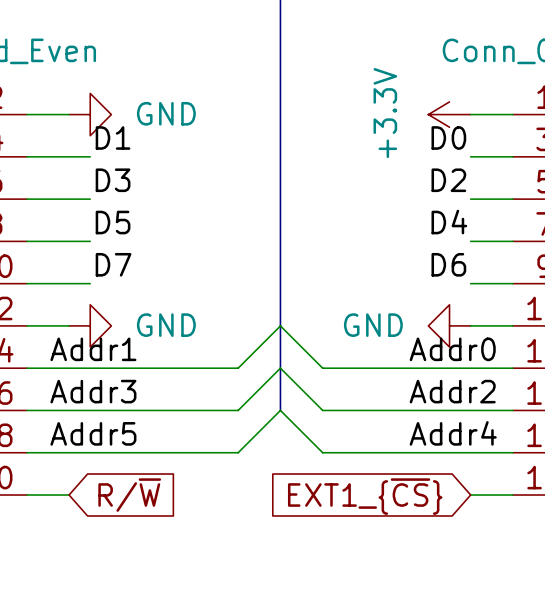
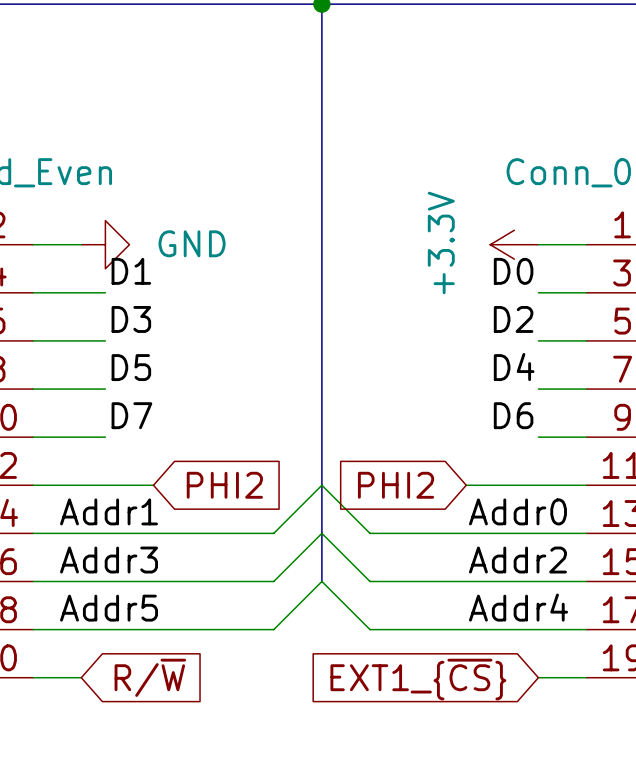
wire: none -> (81, 485) (153, 485)
power symbol: GND (90, 325) -> none
global label: none -> PHI2 (224, 485)
global label: none -> PHI2 (396, 485)
wire: none -> (466, 485) (538, 485)
power symbol: GND (449, 325) -> none

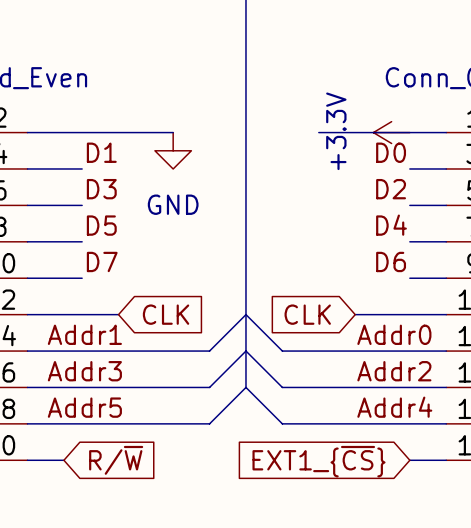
wire: none -> (63, 132) (173, 132)
power symbol rotation: 0° (105, 244) -> 90° clockwise (173, 150)
power symbol position: GND (105, 244) -> GND (173, 150)
wire: none -> (318, 132) (409, 132)
global label: PHI2 (224, 485) -> CLK (166, 314)
global label: PHI2 (396, 485) -> CLK (307, 314)

